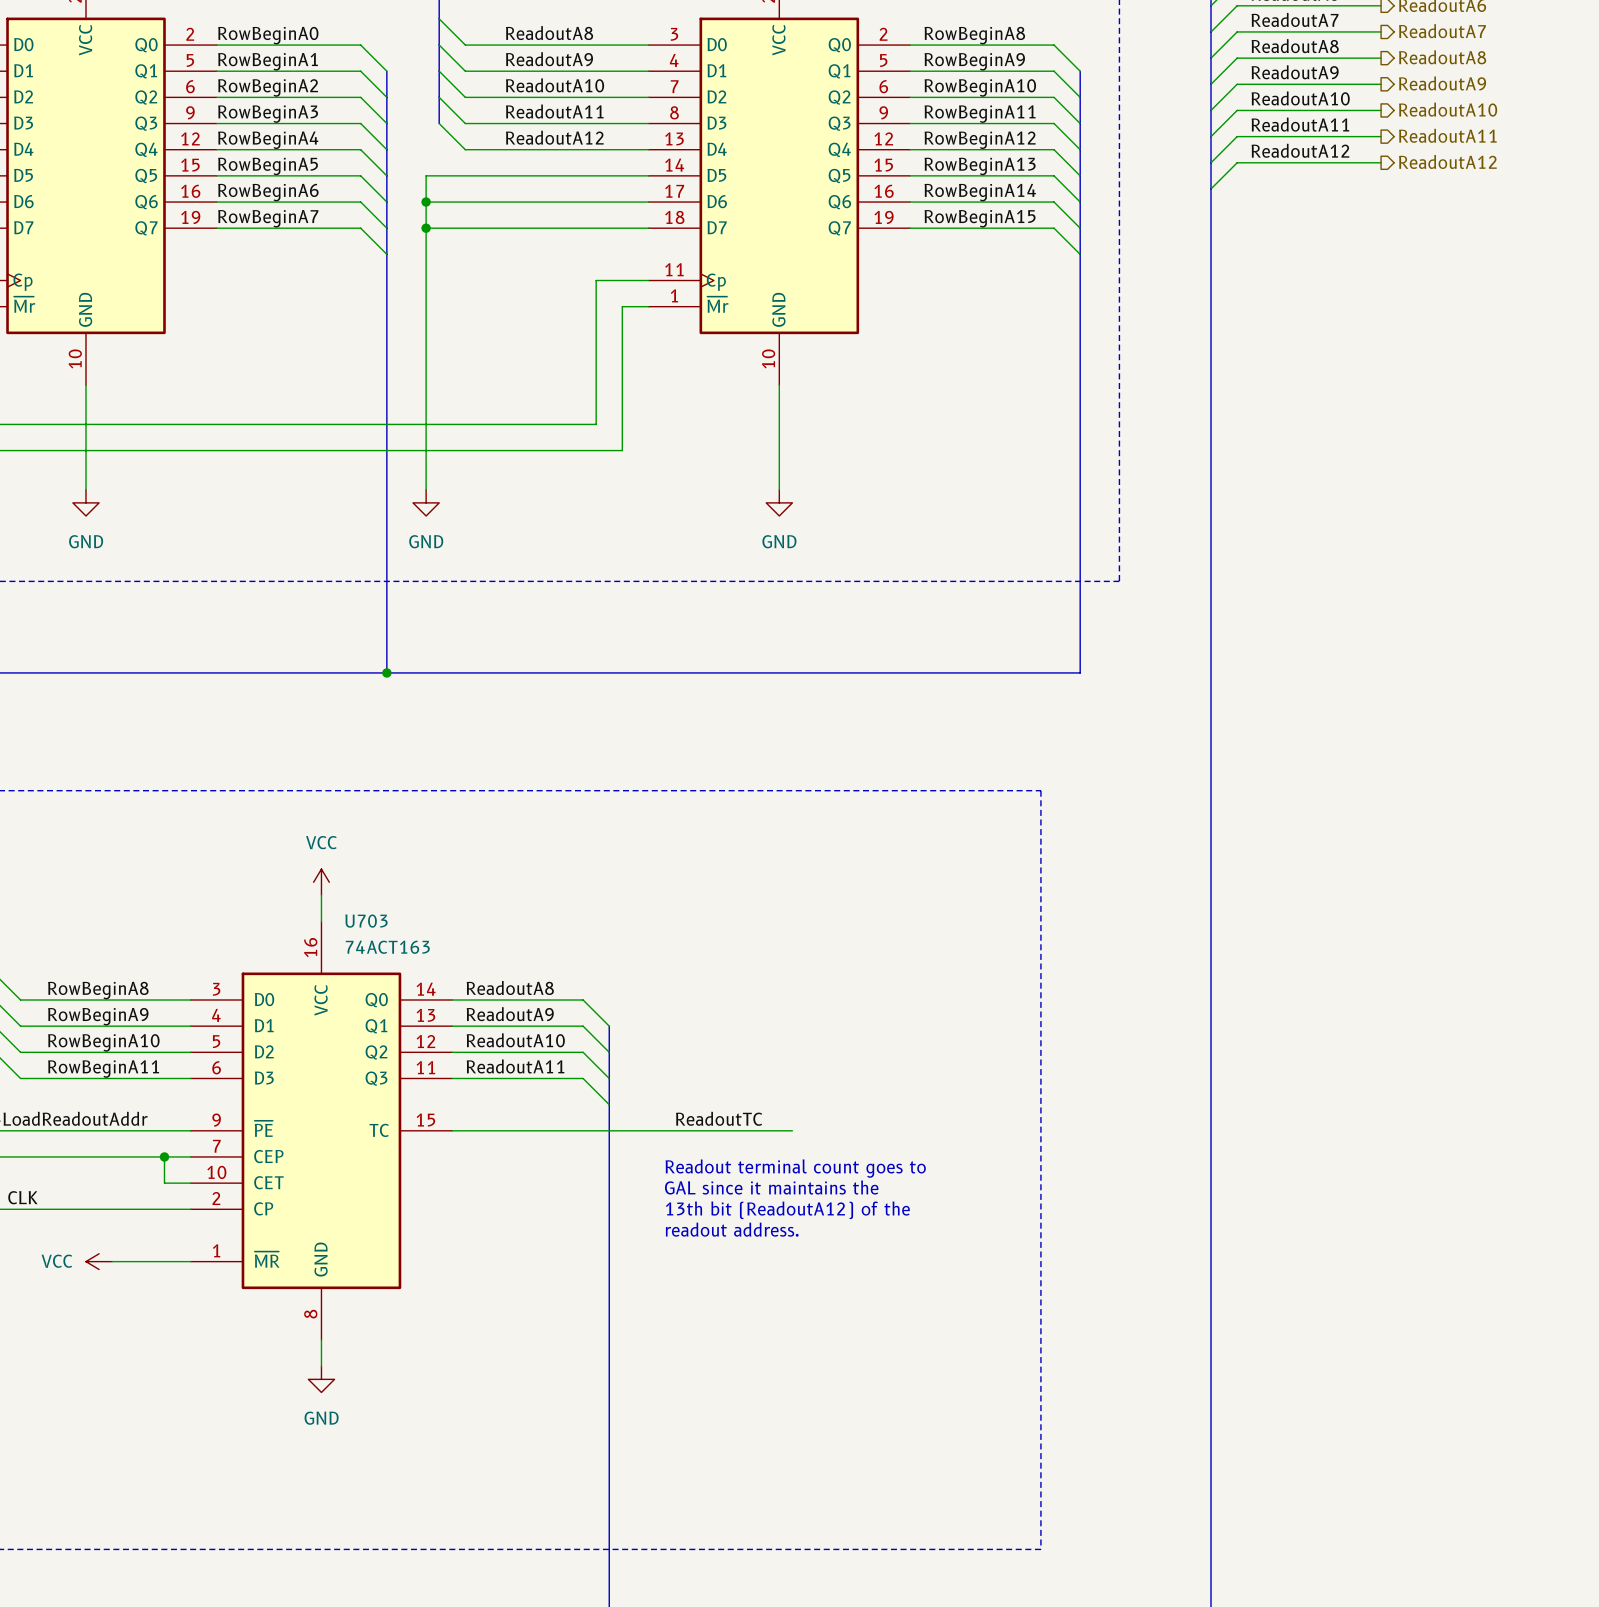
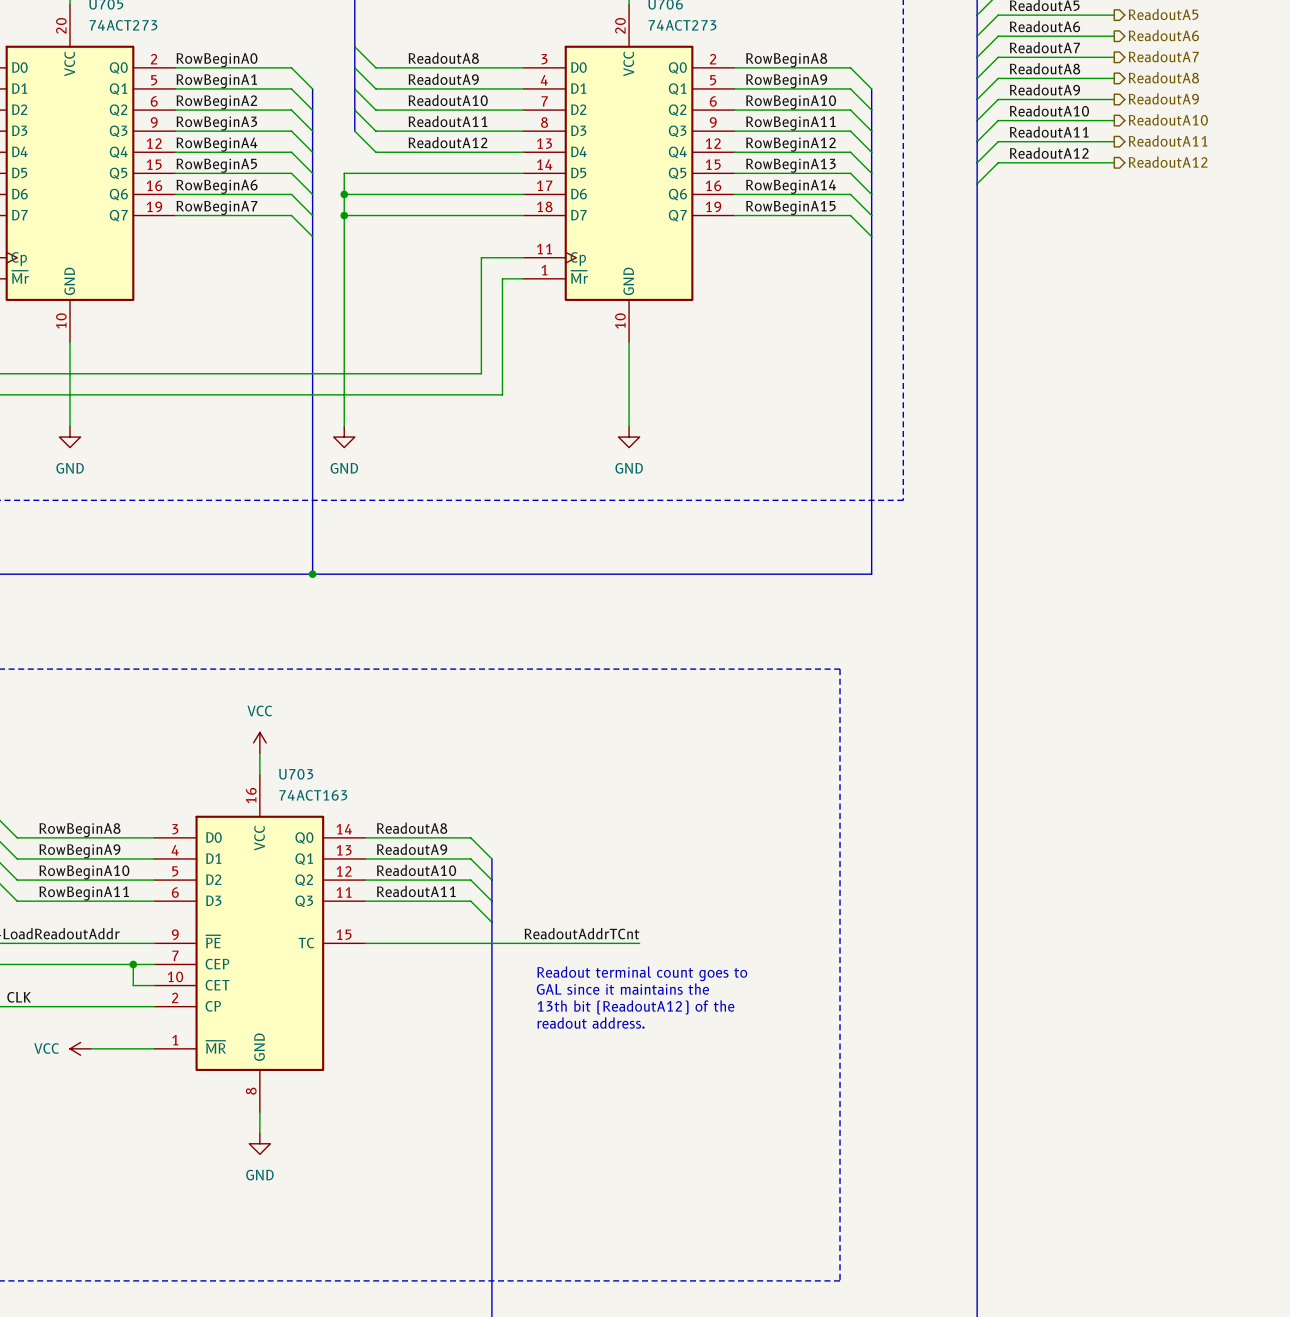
label: ReadoutTC (719, 1118) -> ReadoutAddrTCnt (581, 933)

